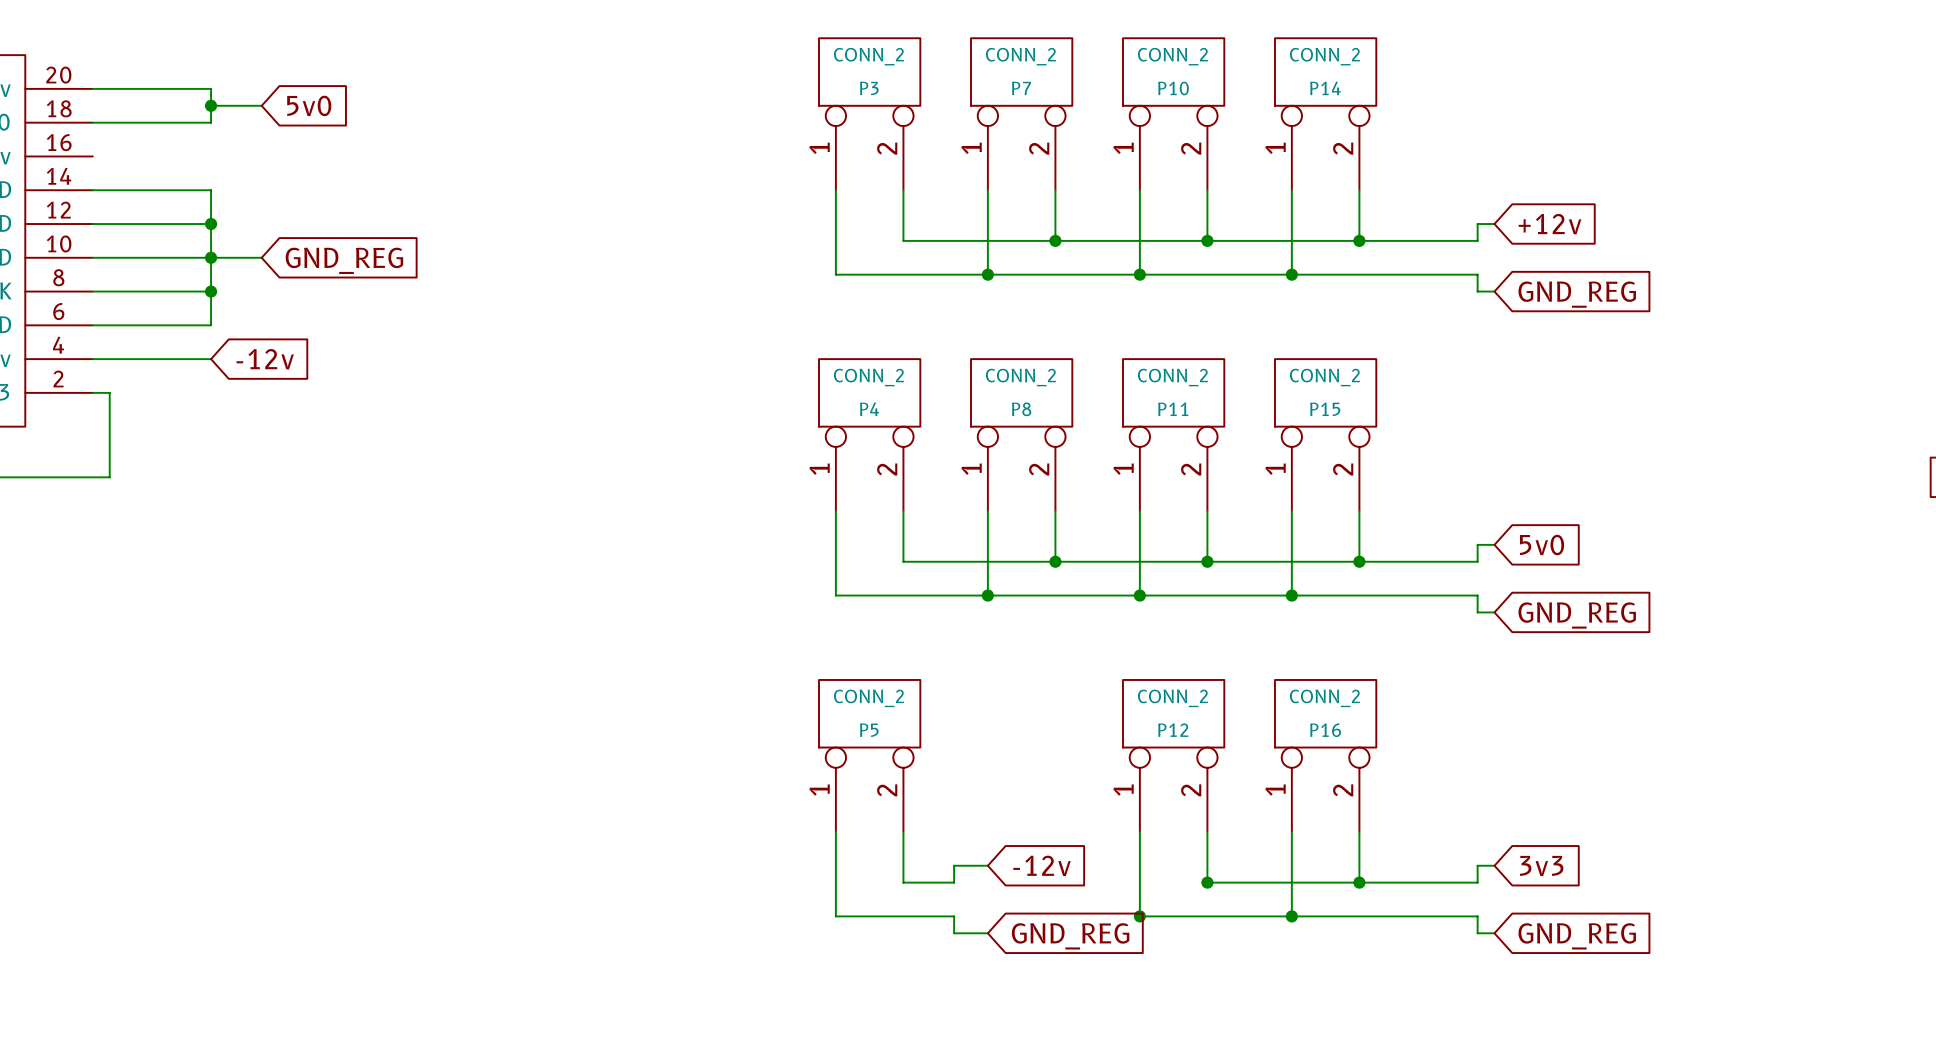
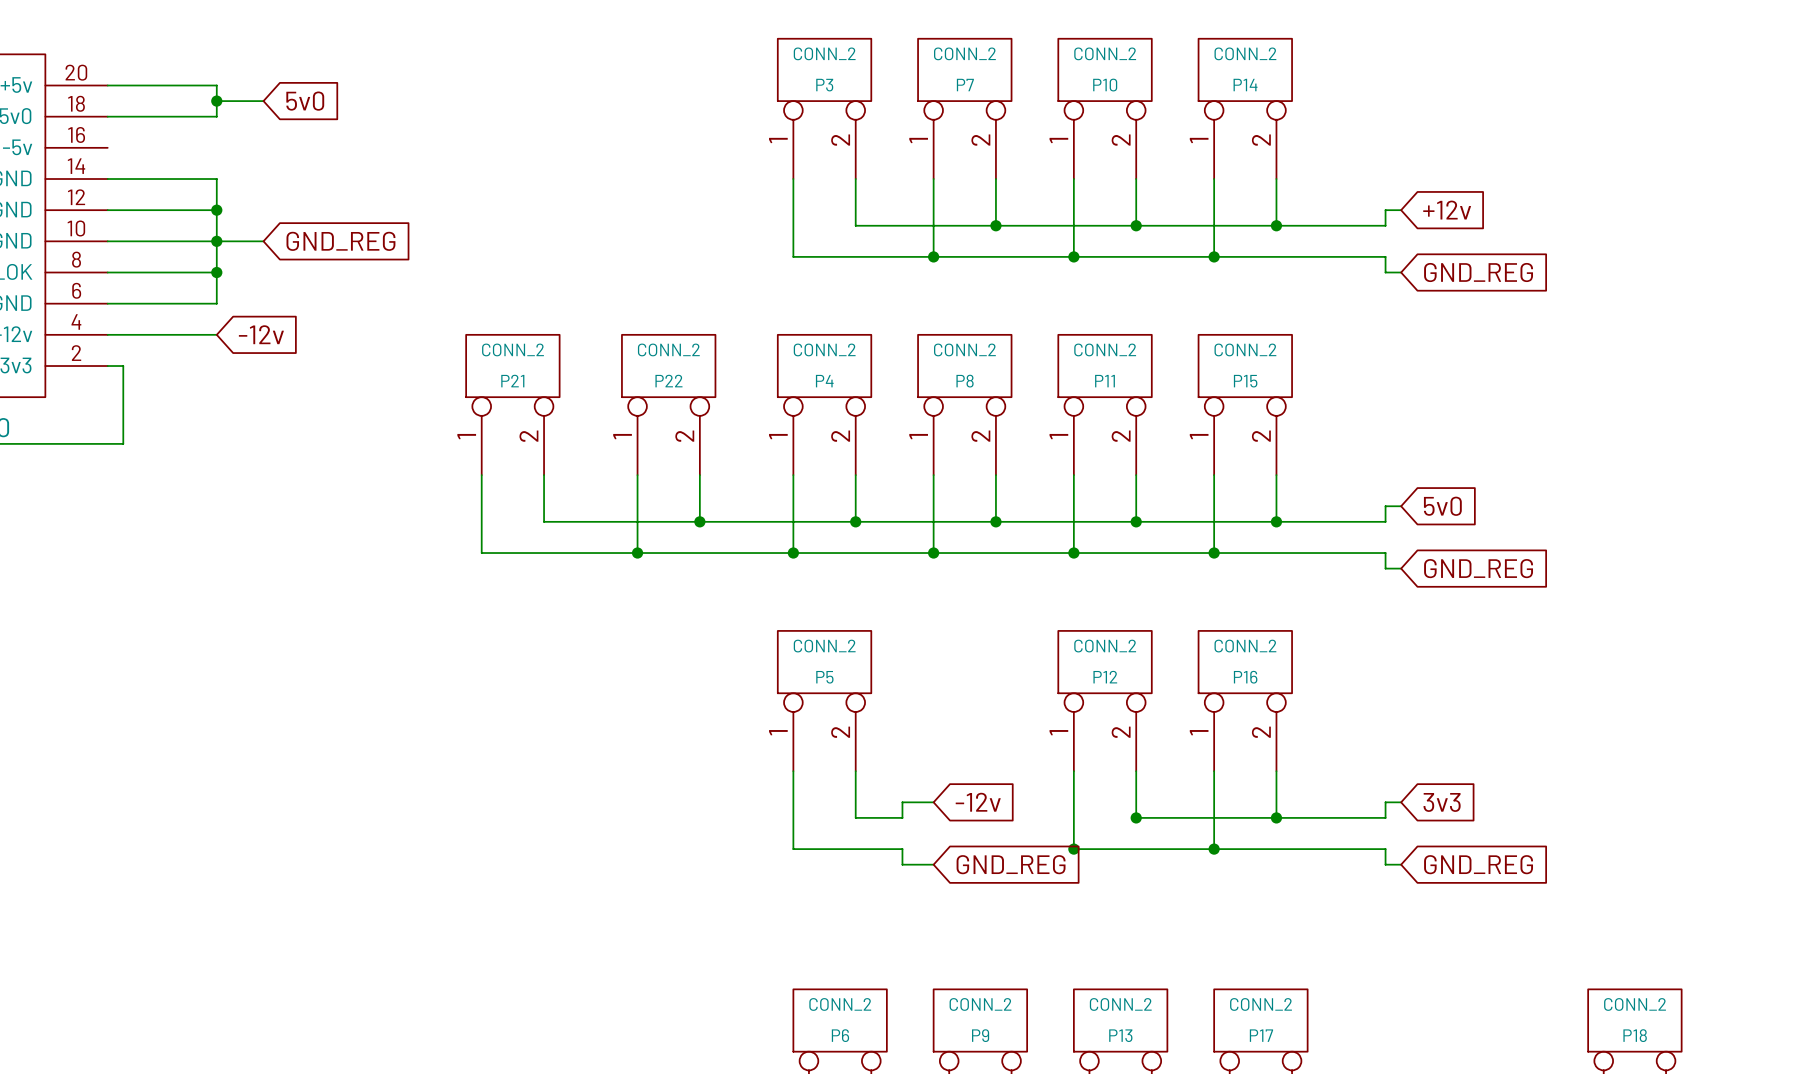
P21: none -> CONN_2 (512, 404)
P22: none -> CONN_2 (668, 404)
wire: none -> (481, 475) (481, 553) (793, 553)
wire: none -> (544, 475) (544, 521) (855, 521)
wire: none -> (637, 475) (637, 553)
wire: none -> (699, 475) (699, 521)
junction: none -> (699, 521)
junction: none -> (855, 521)
junction: none -> (637, 553)
junction: none -> (793, 553)

